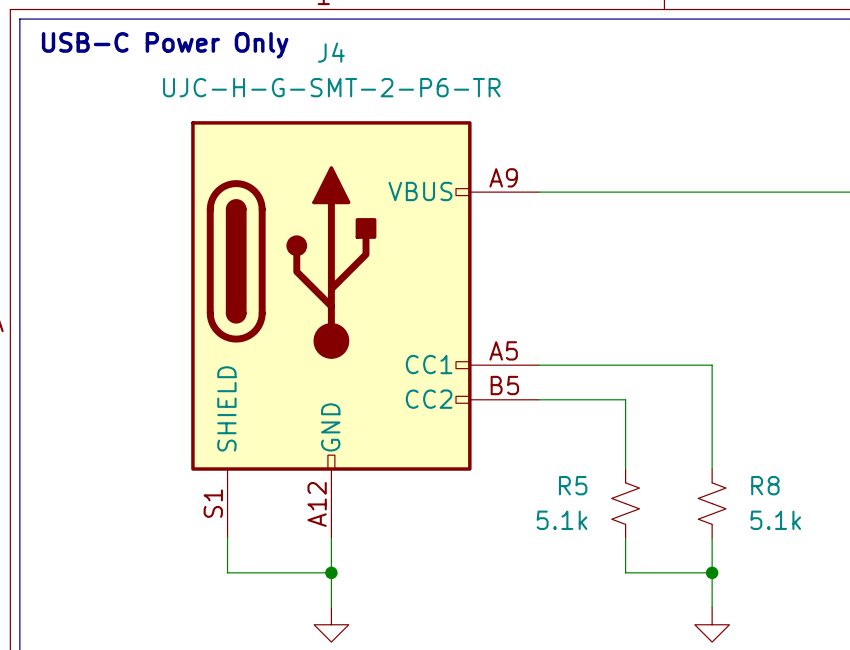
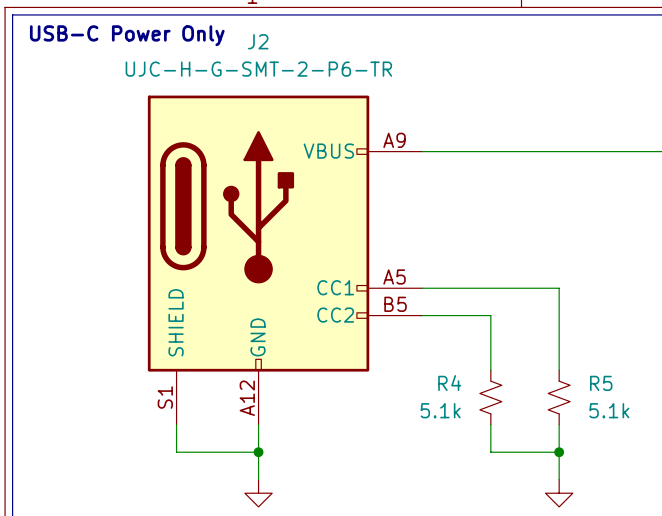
J4 name: J4 (331, 52) -> J2 (258, 41)
R5 name: R5 (573, 485) -> R4 (449, 383)
R8 name: R8 (765, 485) -> R5 (601, 383)

